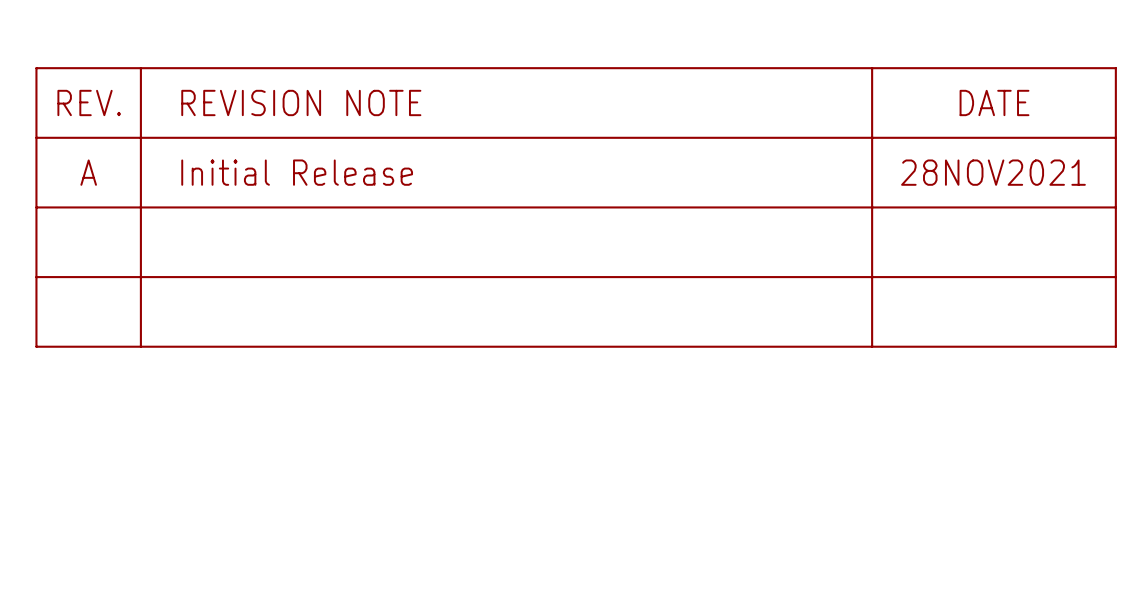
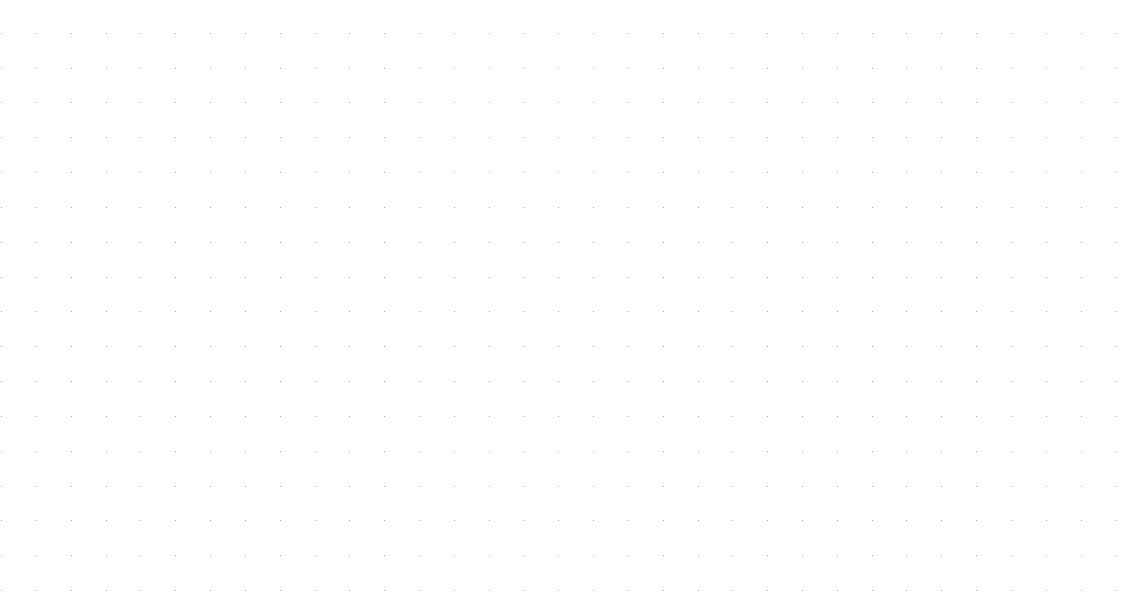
text: 28NOV2021 (993, 172) -> none
part: (576, 207) -> none

